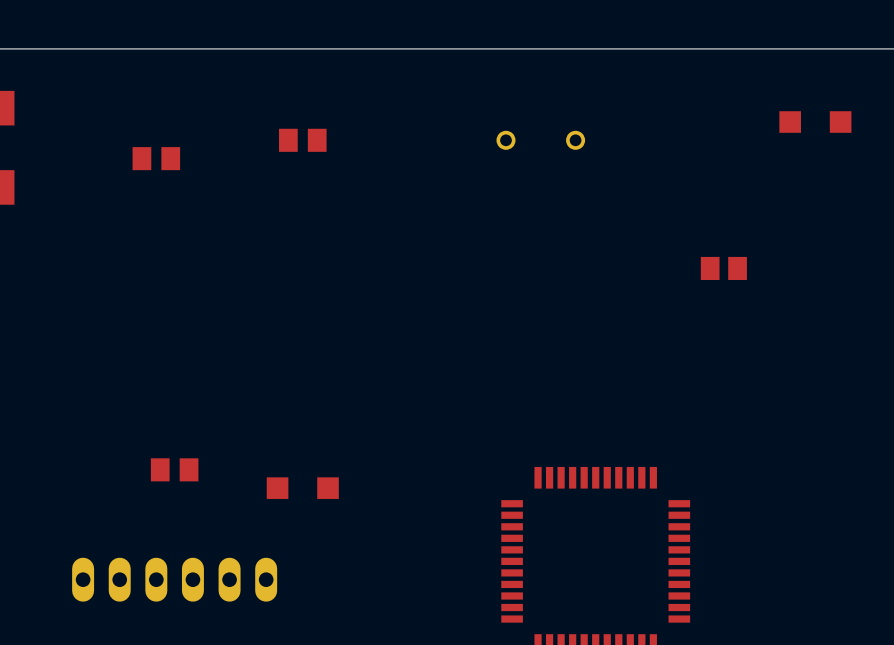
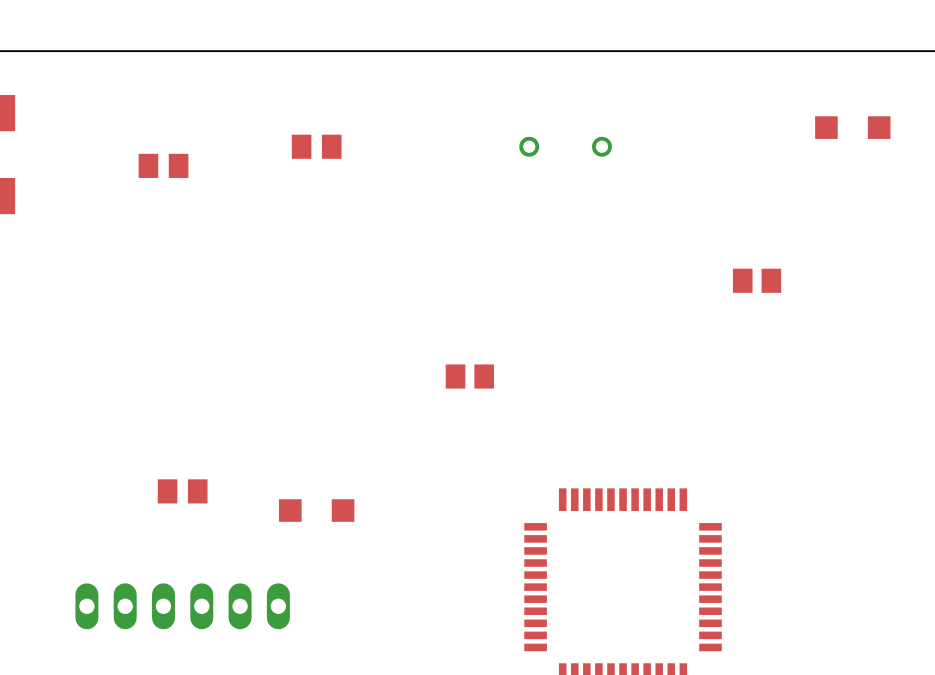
part: none -> (469, 376)

